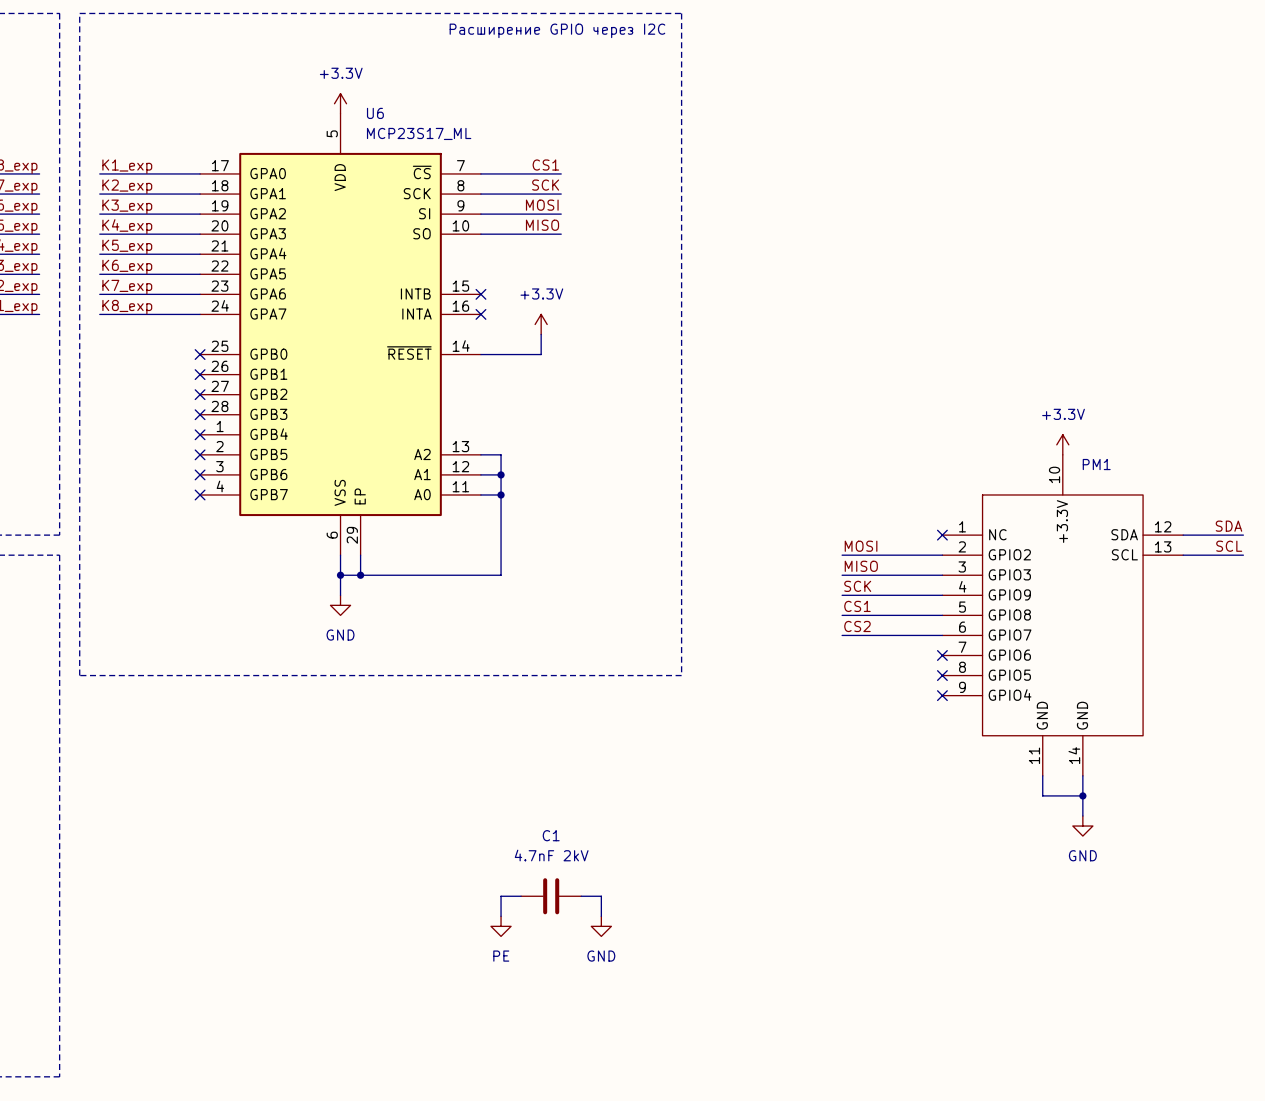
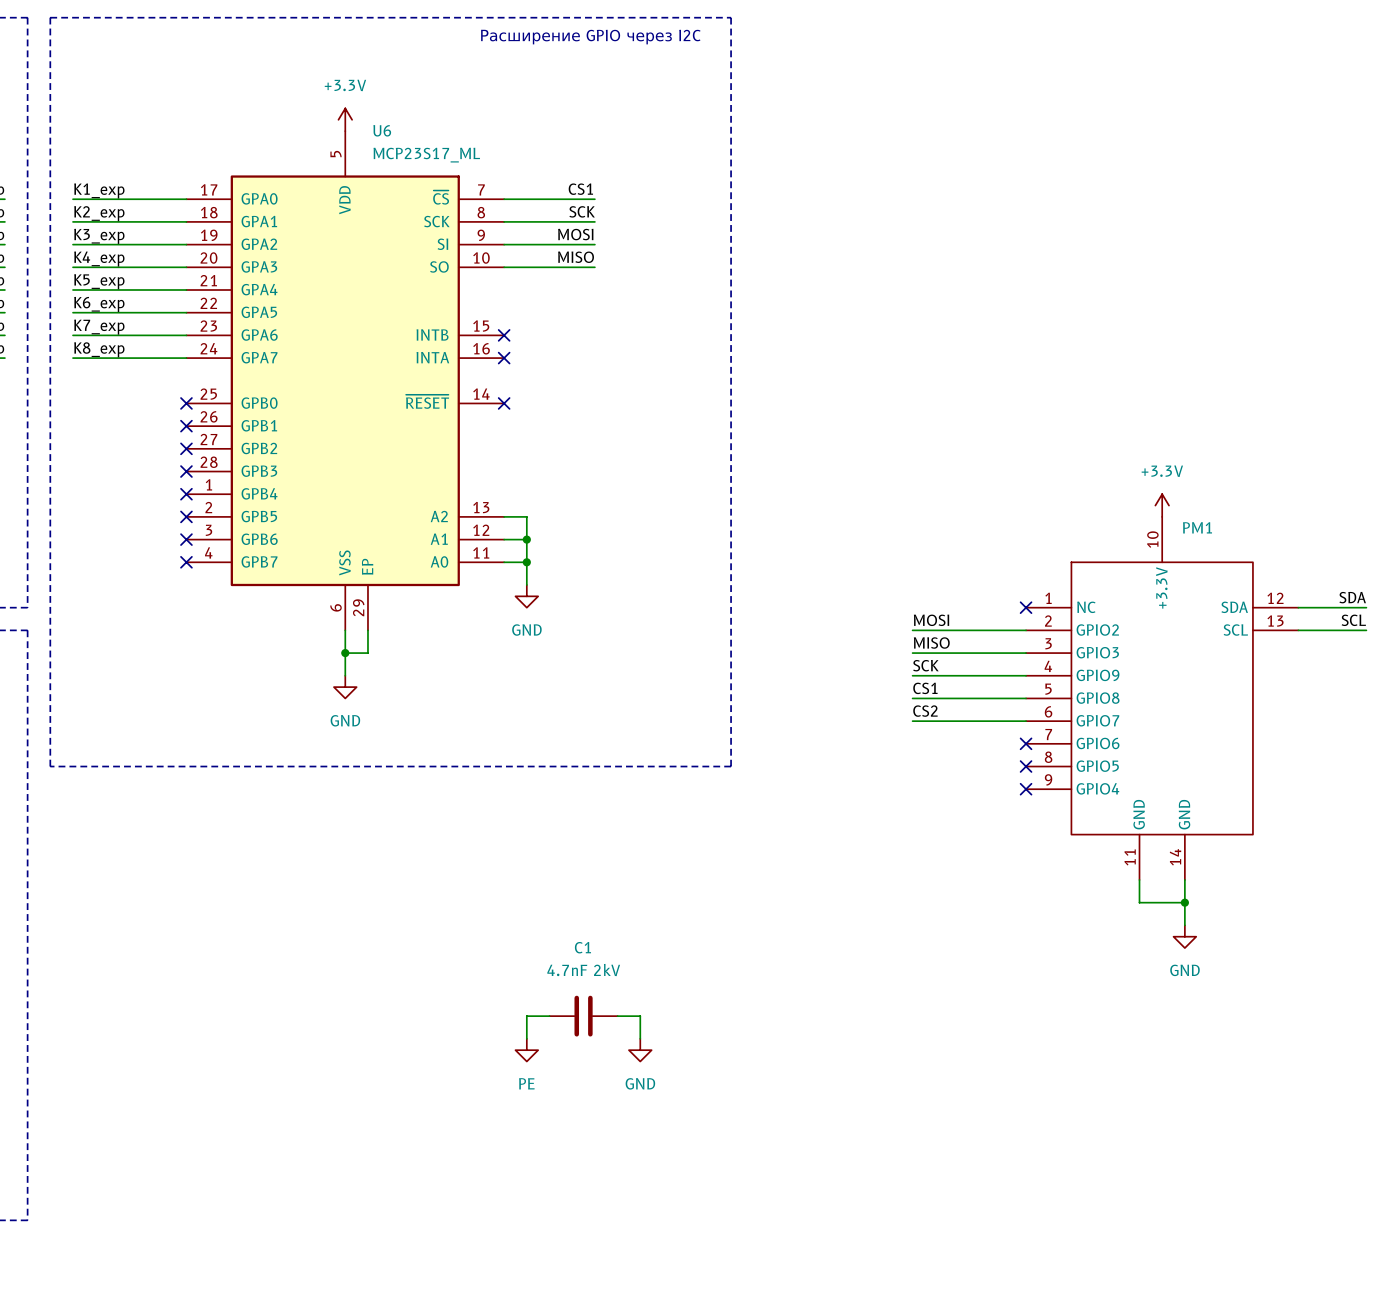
power symbol: +3.3V (541, 324) -> none
wire: (541, 334) (541, 354) (480, 354) -> none
no-connect mark: none -> (504, 403)
wire: (501, 515) (501, 575) (360, 575) -> none
power symbol: none -> GND (526, 596)
junction: (360, 575) -> none

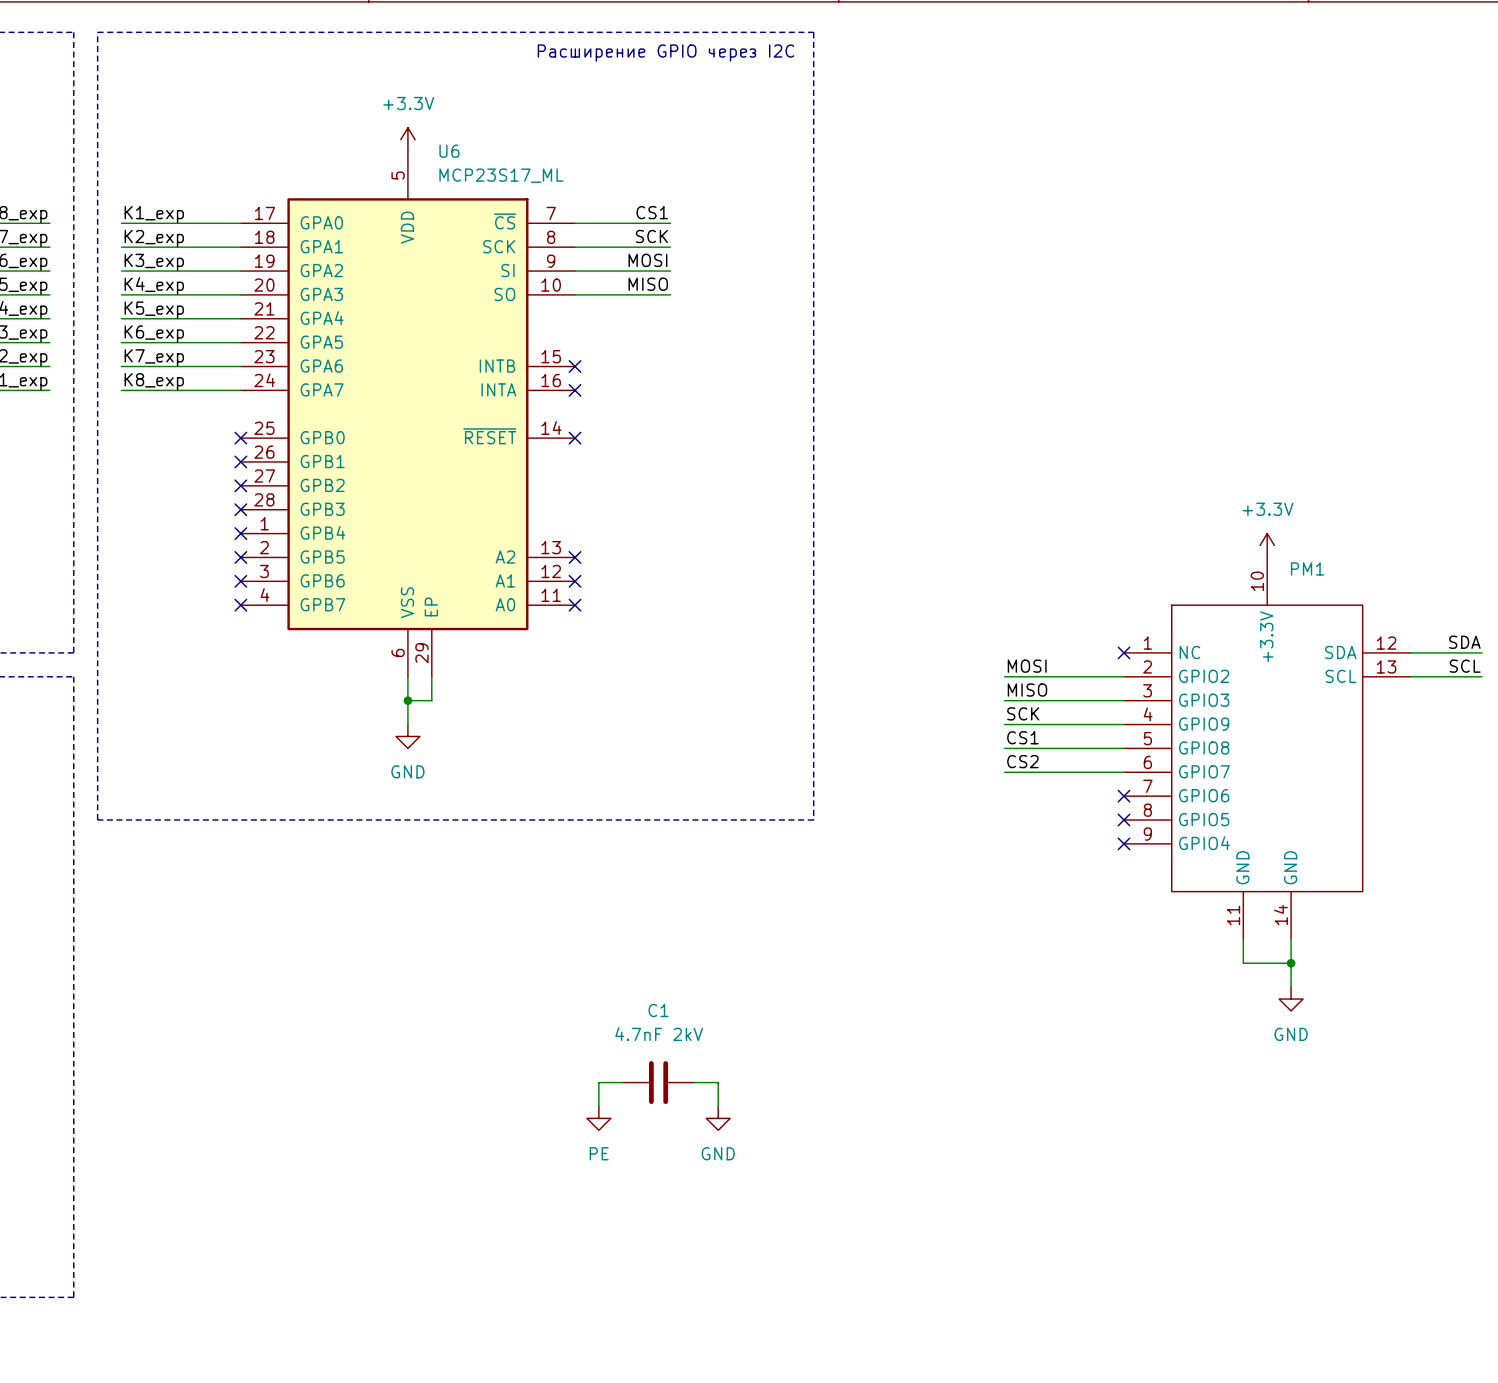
wire: (504, 516) (526, 516) (526, 584) -> none
no-connect mark: none -> (575, 557)
wire: (504, 539) (526, 539) -> none
no-connect mark: none -> (575, 581)
junction: (526, 539) -> none
wire: (504, 562) (526, 562) -> none
no-connect mark: none -> (575, 605)
junction: (526, 562) -> none
power symbol: GND (526, 596) -> none

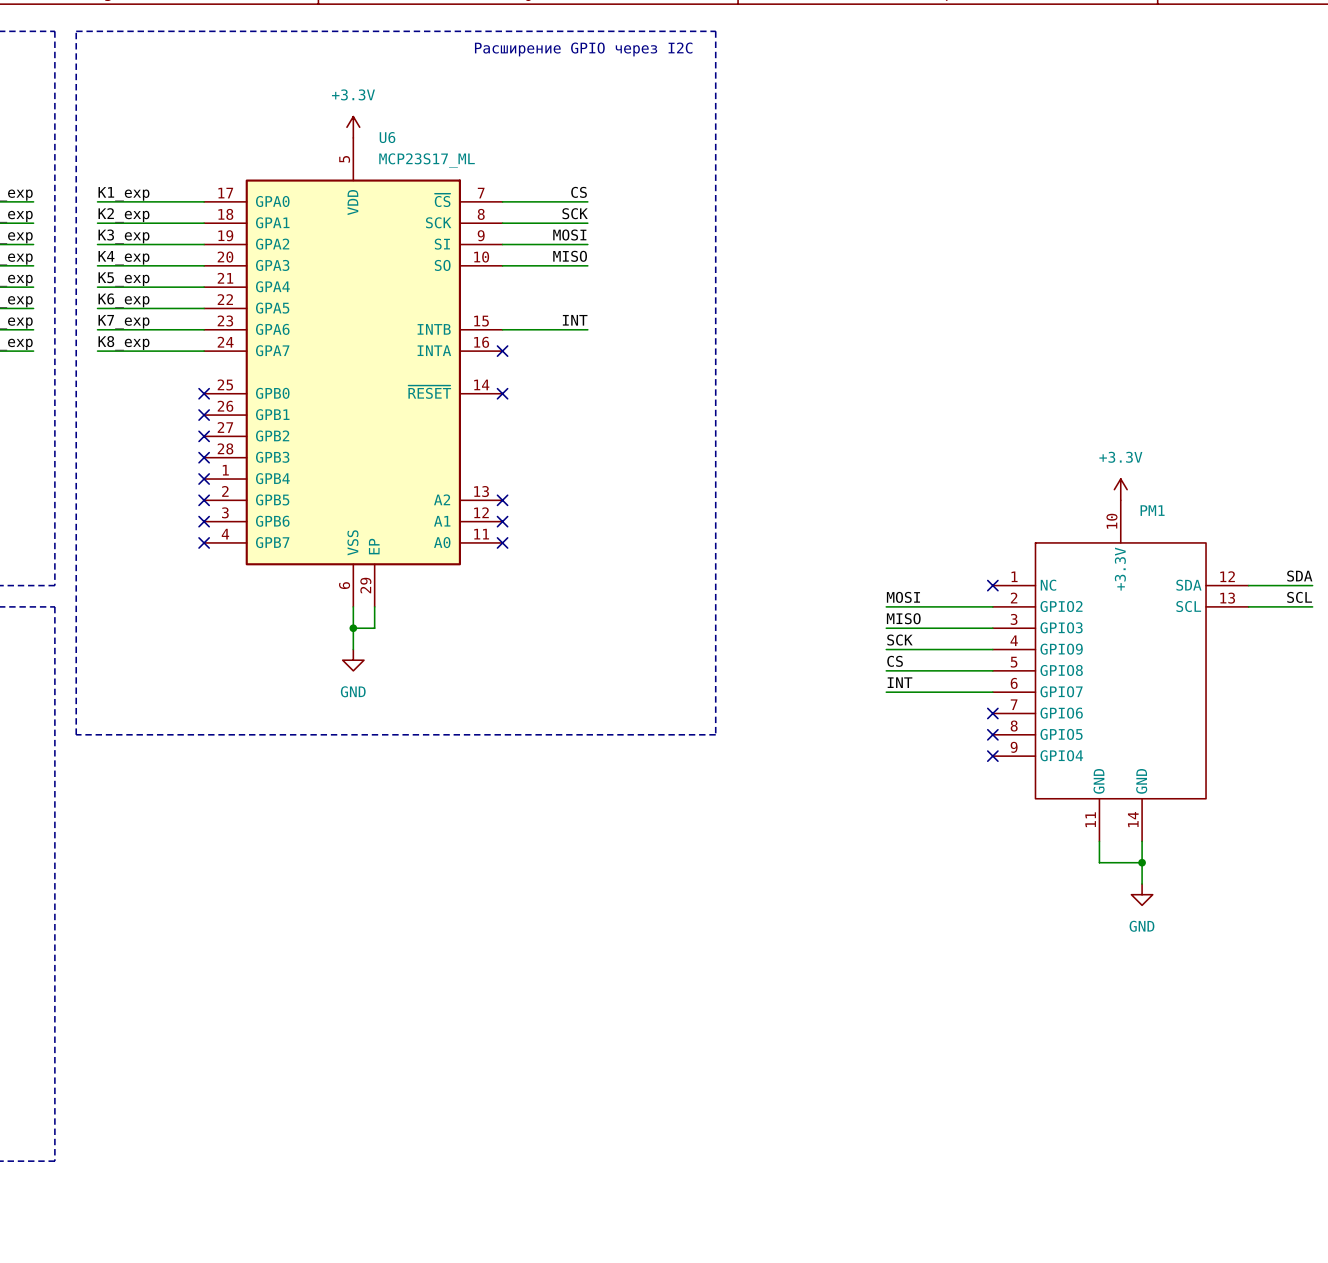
label: CS1 (652, 212) -> CS (579, 192)
label: none -> INT (575, 320)
wire: none -> (502, 329) (587, 329)
no-connect mark: (575, 366) -> none
label: CS1 (1022, 737) -> CS (895, 661)
label: CS2 (1022, 761) -> INT (900, 682)
wire: (622, 1082) (598, 1082) (598, 1106) -> none
C1: 4.7nF 2kV (658, 1082) -> none
wire: (694, 1082) (718, 1082) (718, 1106) -> none
power symbol: PE (598, 1118) -> none
power symbol: GND (718, 1118) -> none

